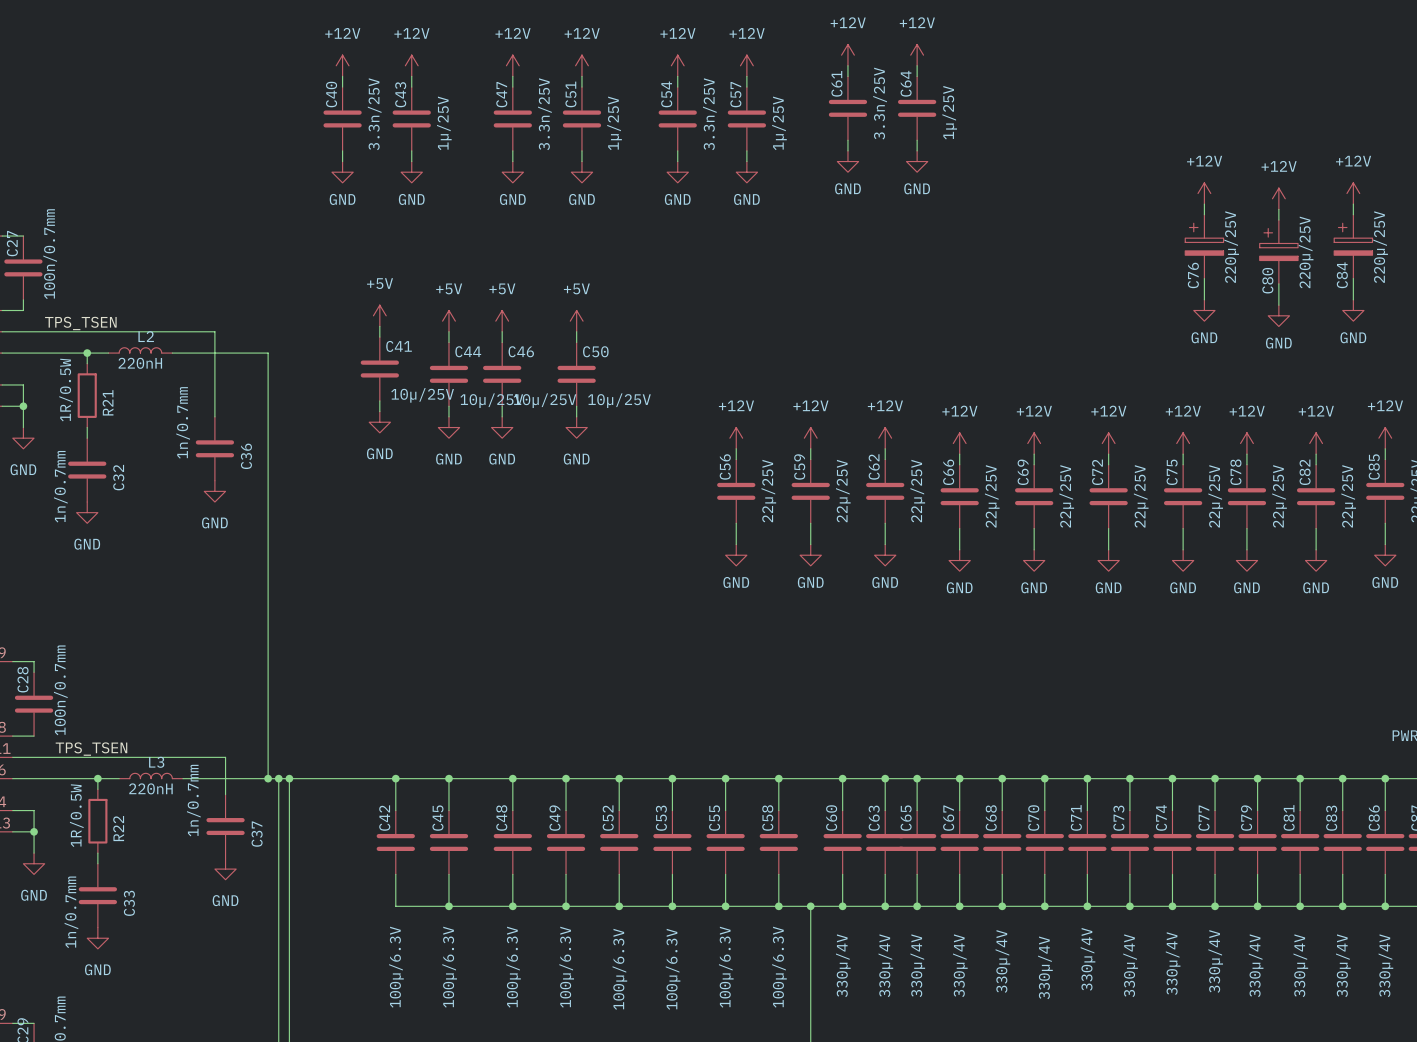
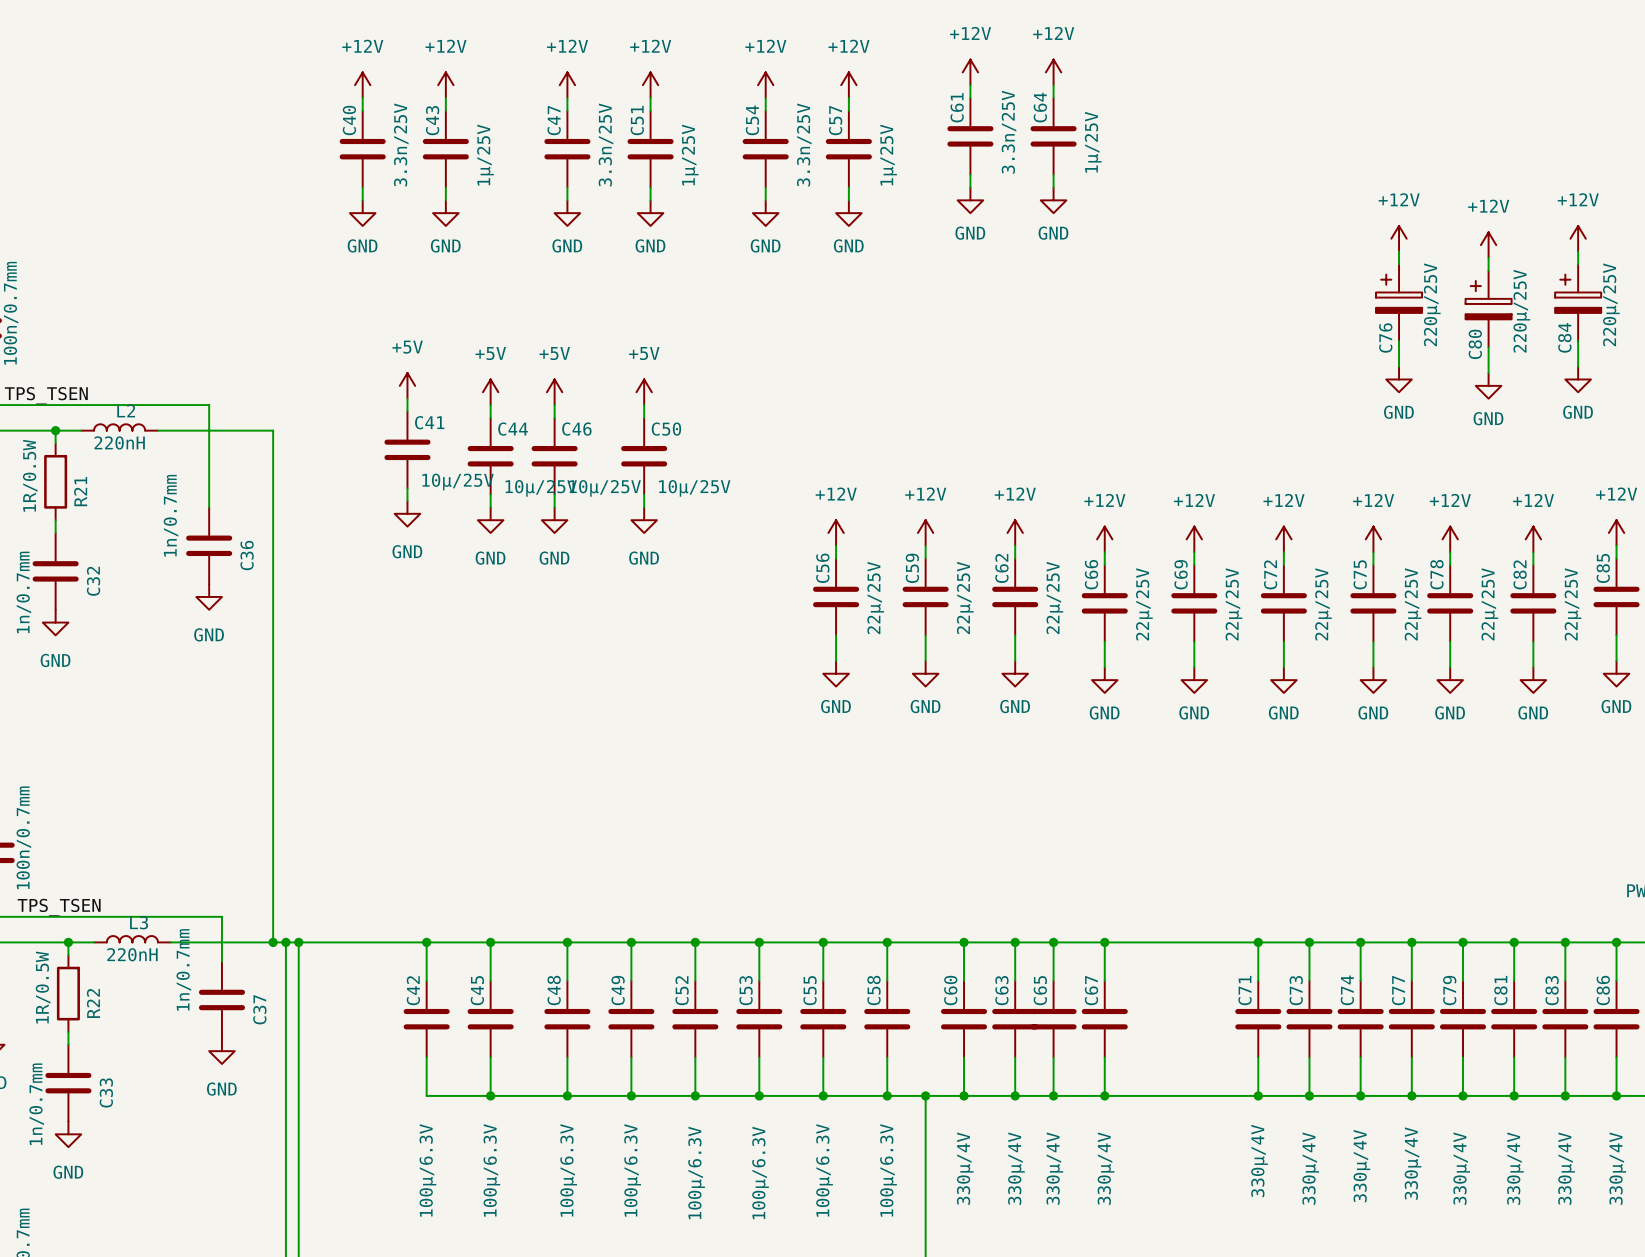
wire: (1002, 778) (1002, 810) -> none
junction: (1002, 778) -> none
wire: (1044, 778) (1044, 810) -> none
junction: (1044, 778) -> none
C68: 330µ/4V (1002, 842) -> none
C70: 330µ/4V (1044, 842) -> none
wire: (1002, 874) (1002, 906) -> none
wire: (1044, 874) (1044, 906) -> none
junction: (1002, 906) -> none
junction: (1044, 906) -> none

